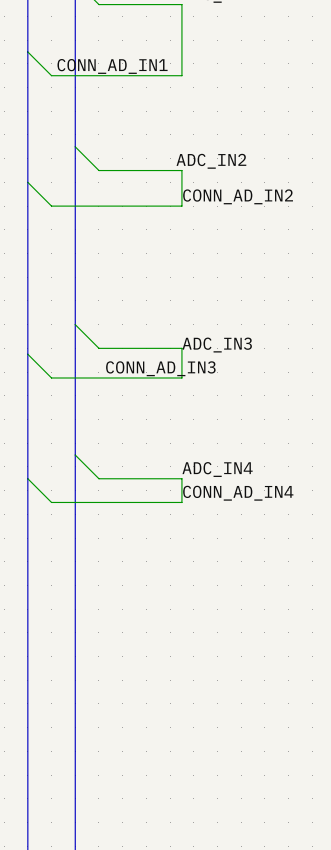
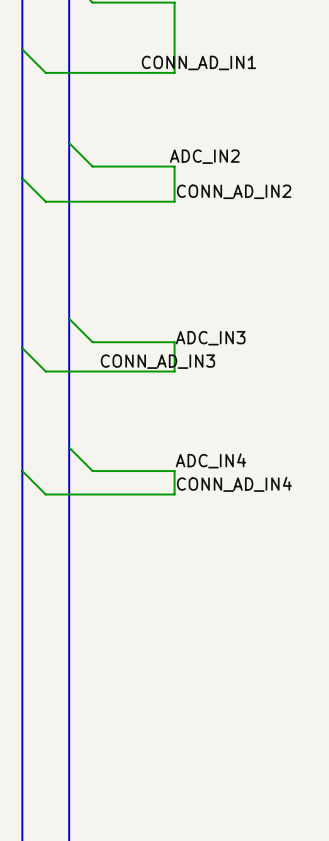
label position: CONN_AD_IN1 (112, 66) -> CONN_AD_IN1 (198, 62)

